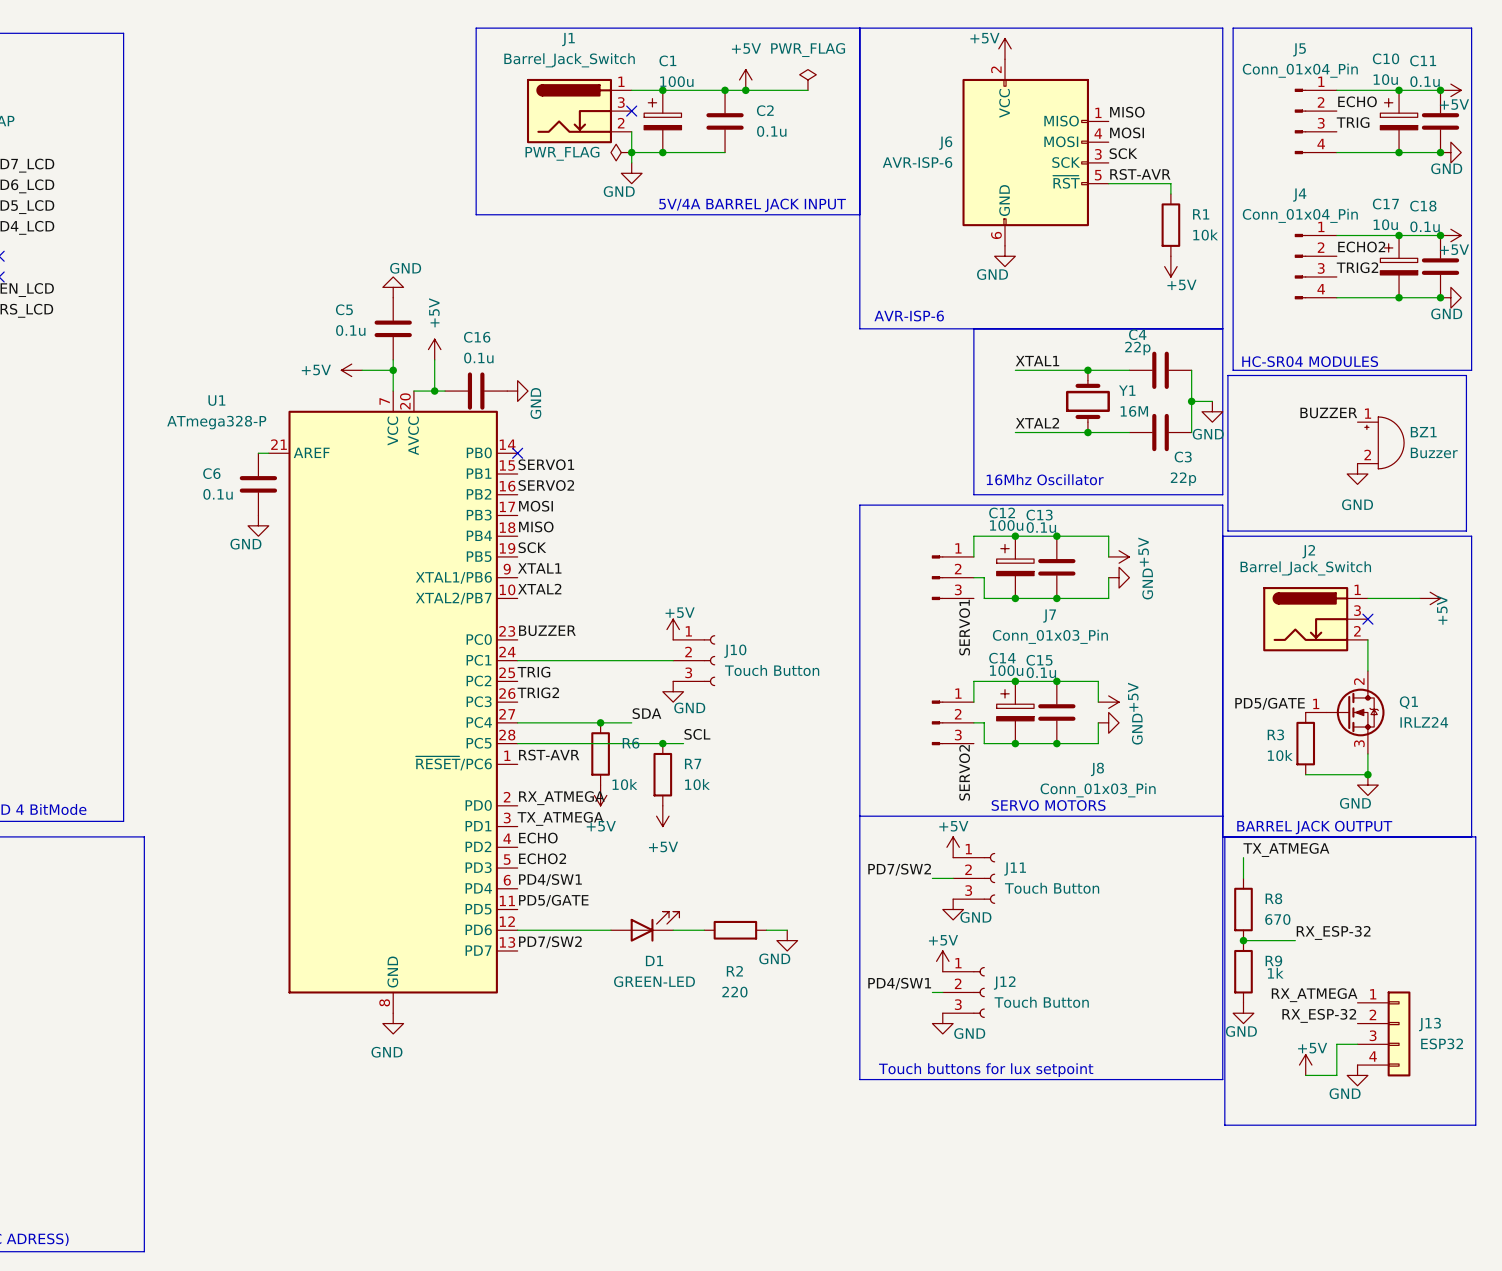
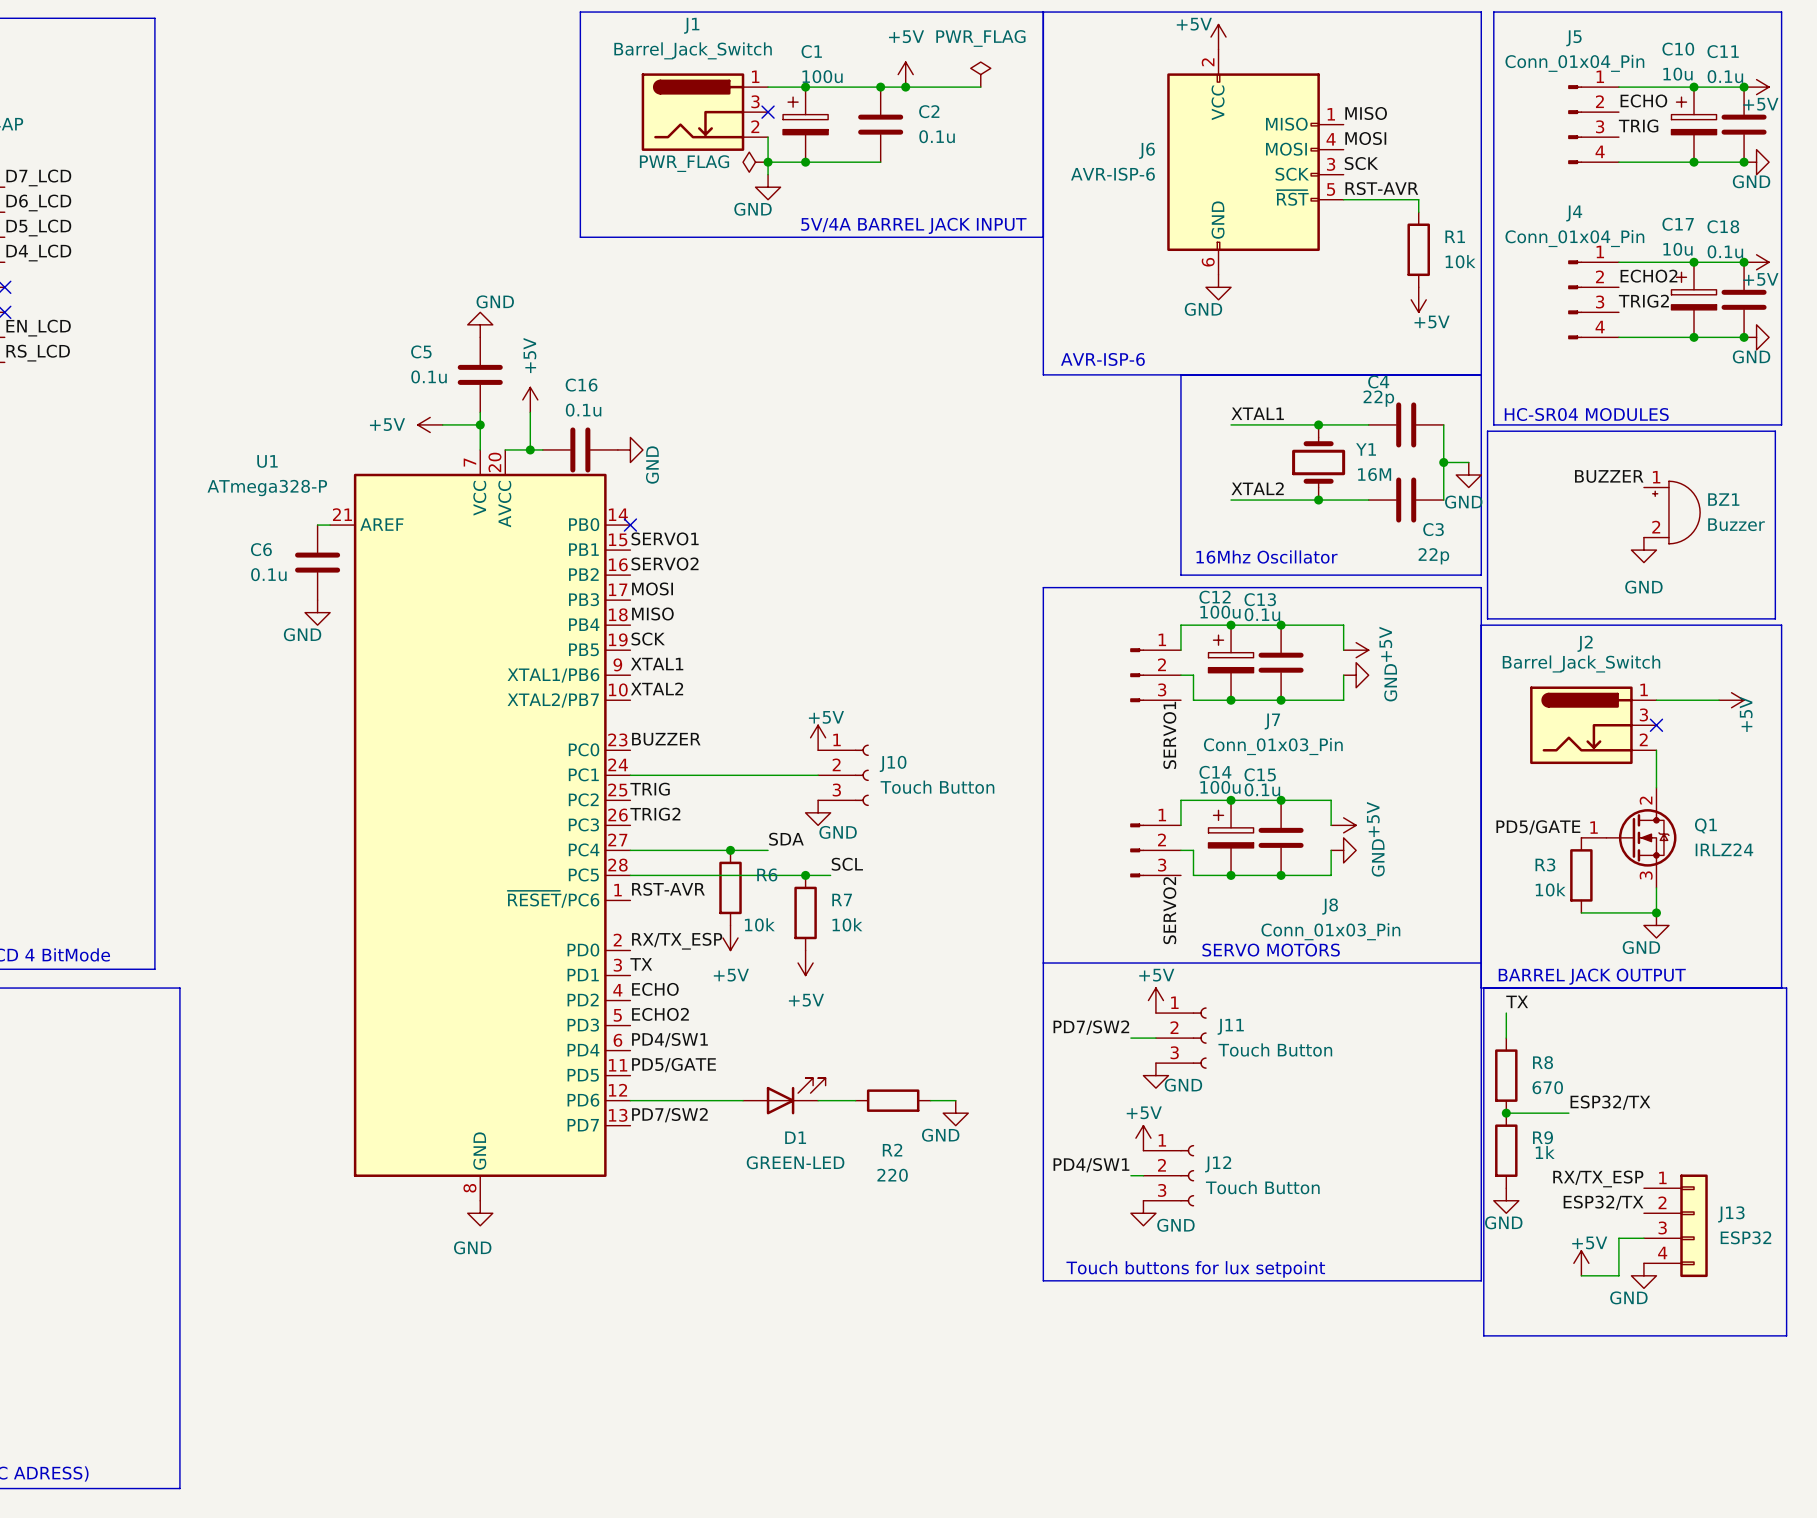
label: RX_ATMEGA (561, 798) -> RX/TX_ESP (677, 941)
label: TX_ATMEGA (560, 818) -> TX (641, 964)
label: TX_ATMEGA (1286, 849) -> TX (1517, 1001)
label: RX_ESP-32 (1333, 932) -> ESP32/TX (1610, 1102)
label: RX_ATMEGA (1314, 995) -> RX/TX_ESP (1598, 1178)
label: RX_ESP-32 (1319, 1015) -> ESP32/TX (1603, 1202)

